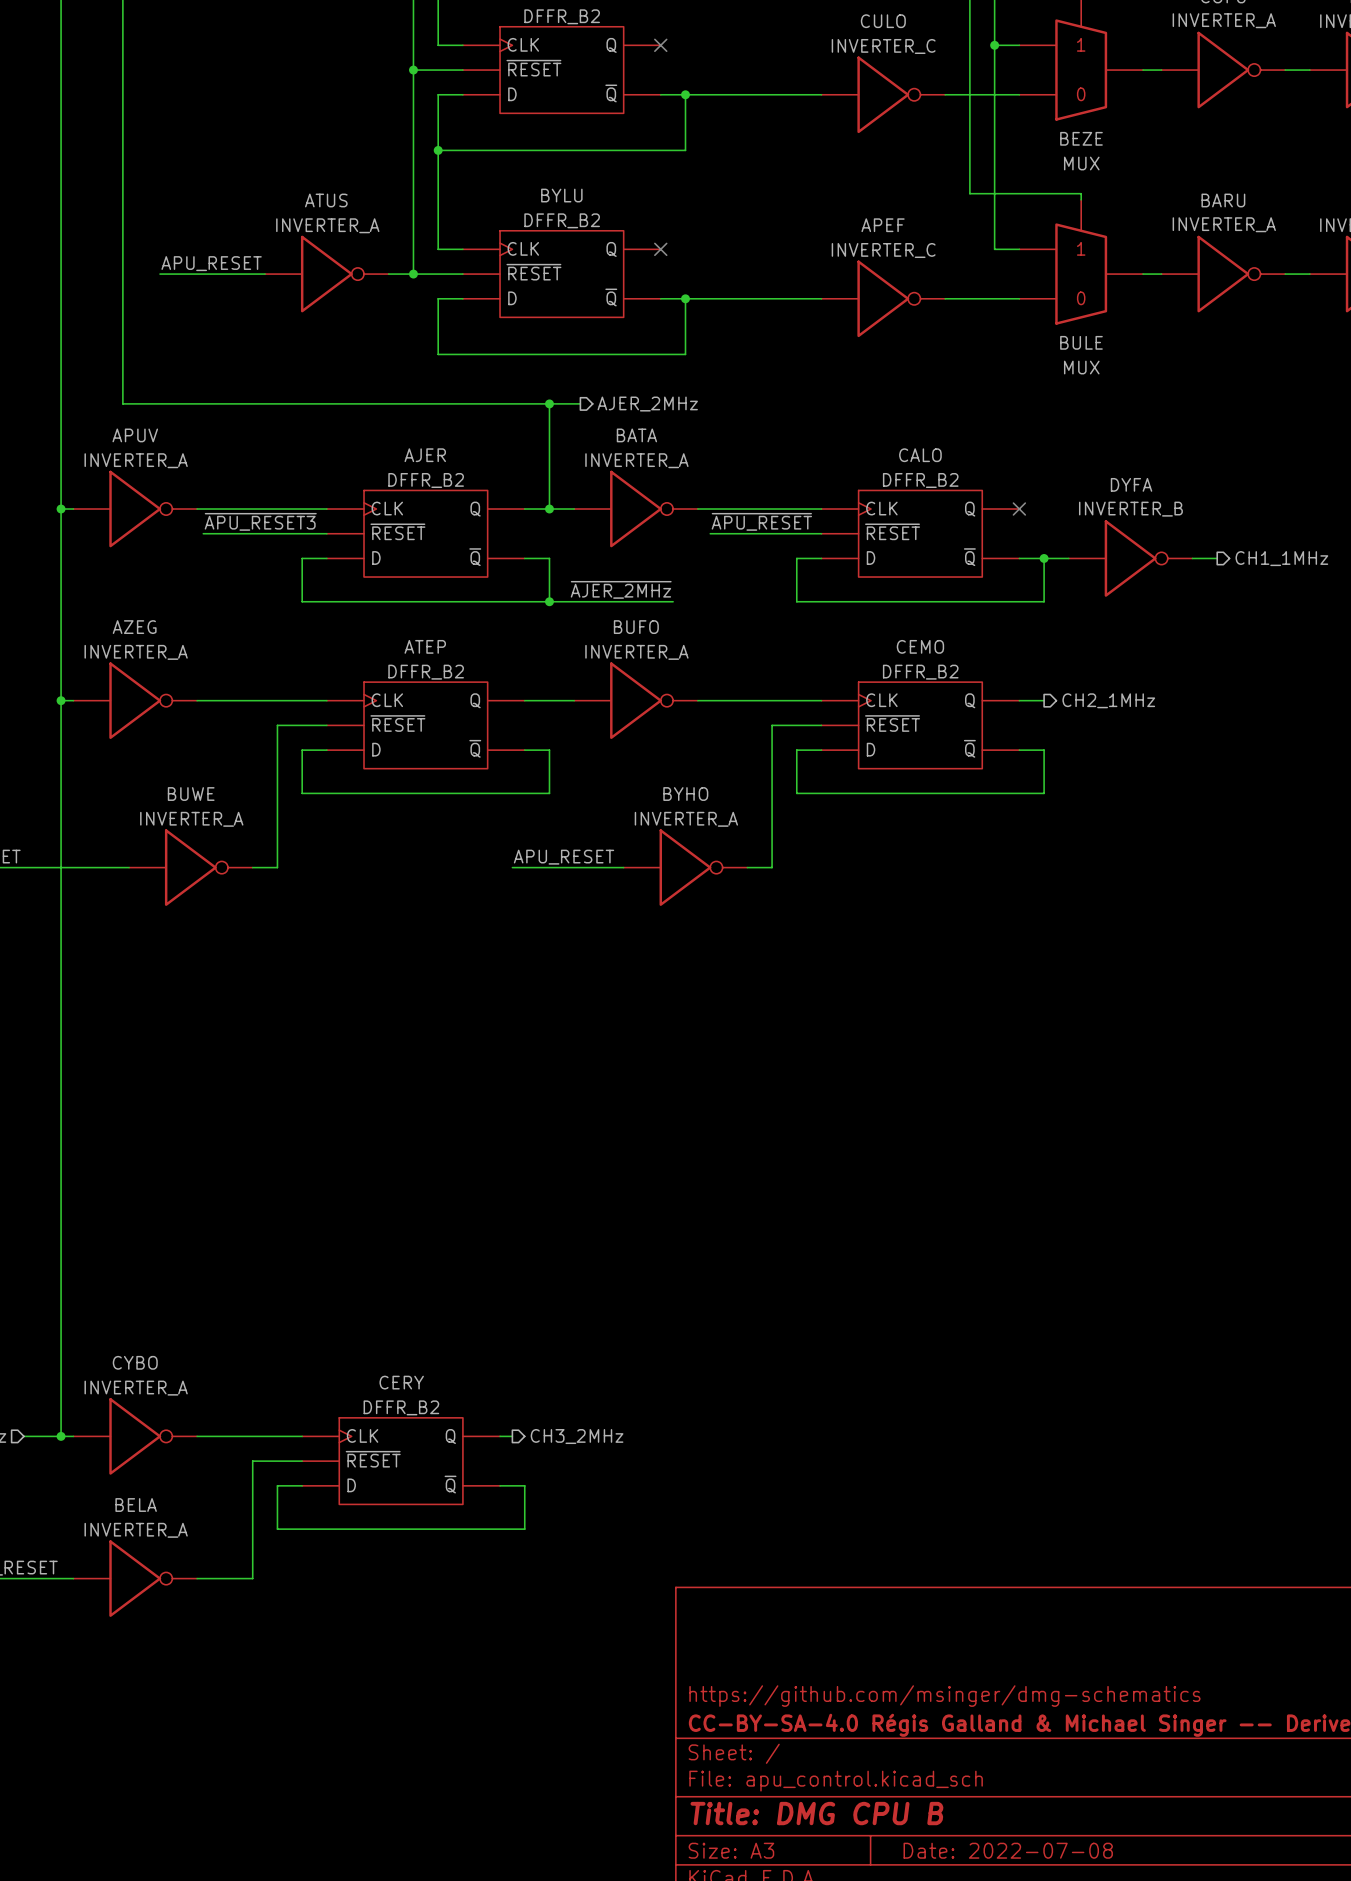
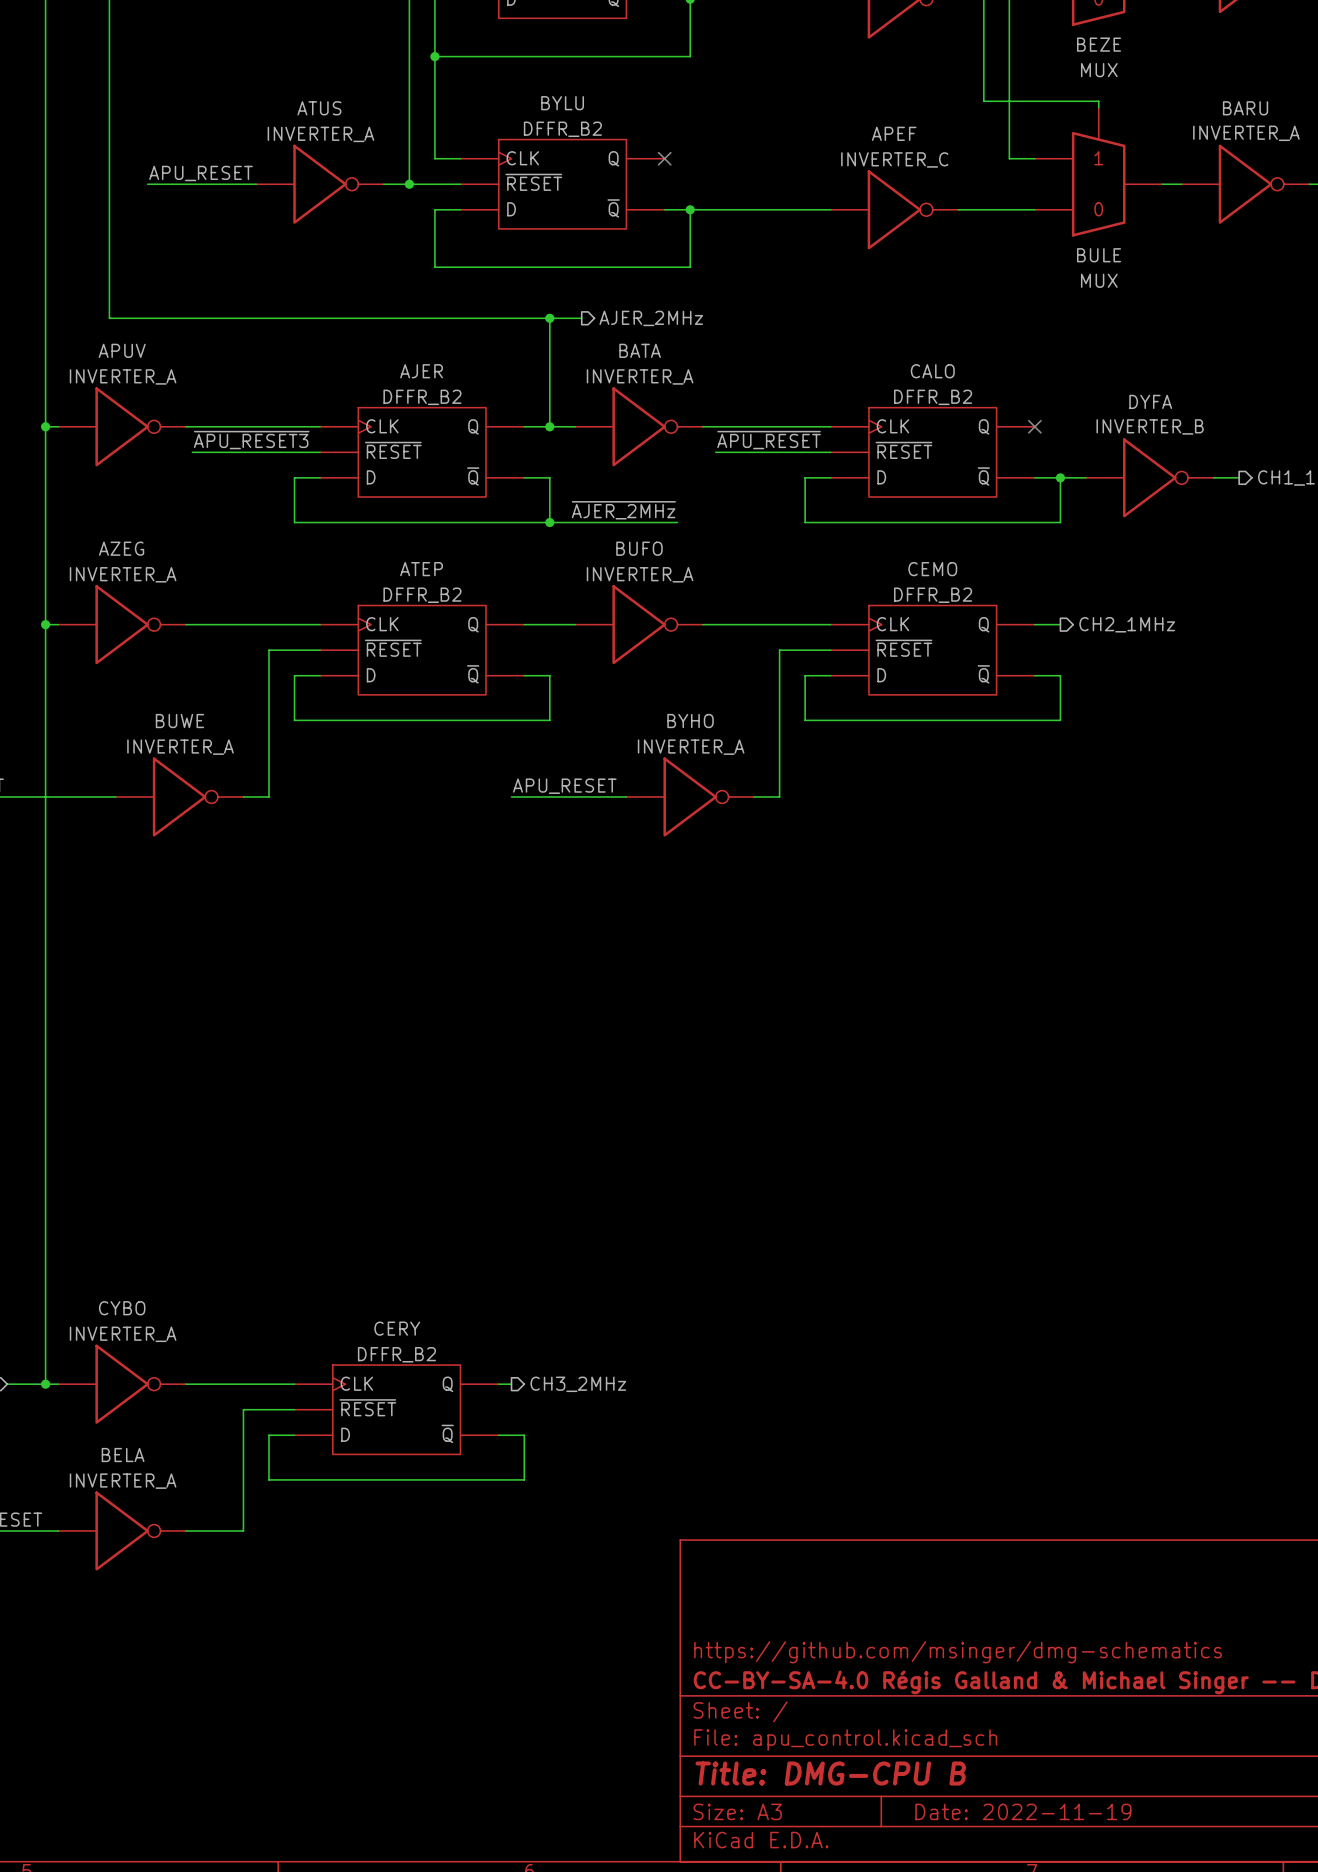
title block: Title: DMG CPU B (816, 1813) -> Title: DMG-CPU B (830, 1773)
title block: Date: 2022-07-08 (1008, 1850) -> Date: 2022-11-19 (1023, 1811)

